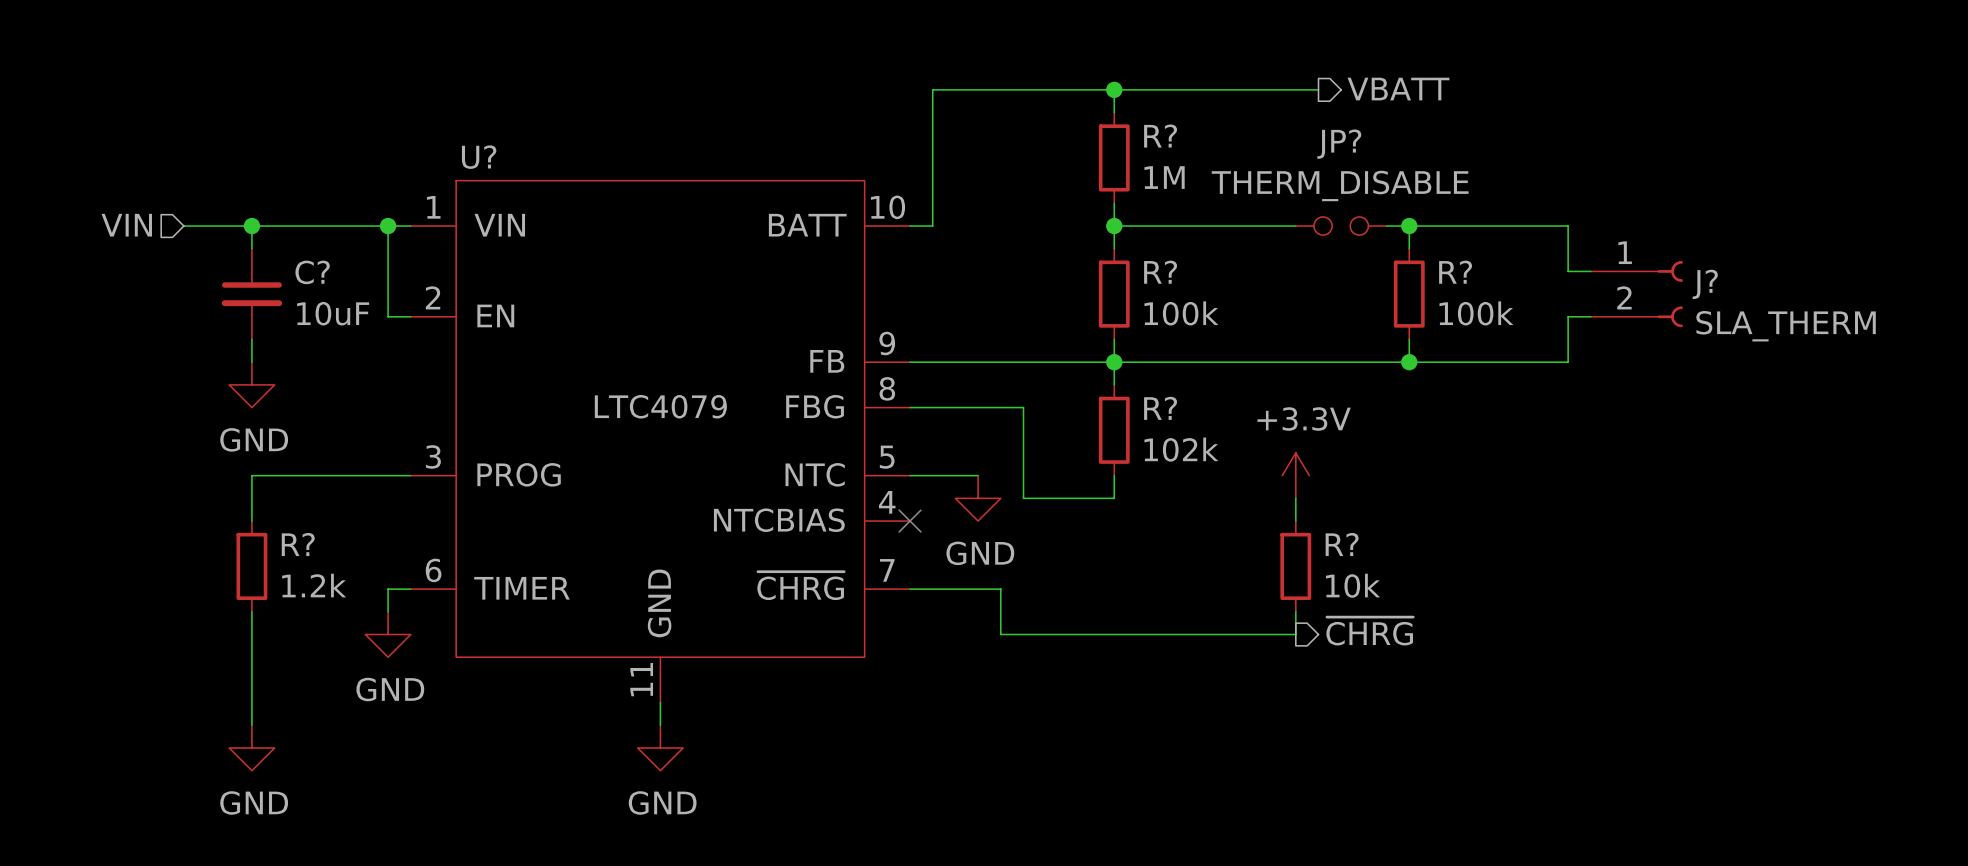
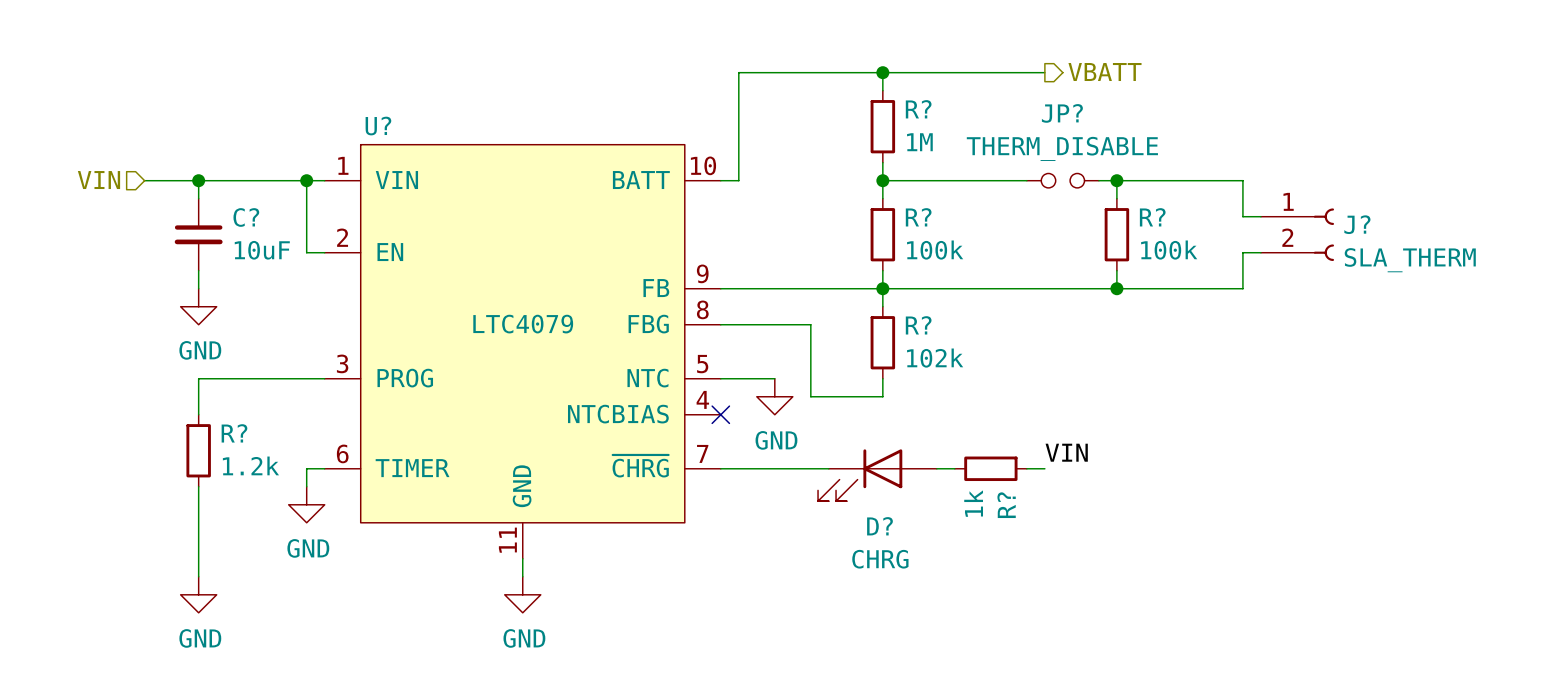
power symbol: +3.3V (1295, 475) -> none
wire: (1295, 498) (1295, 521) -> none
R?: 10k (1295, 566) -> none
label: none -> VIN (1066, 452)
wire: (1000, 589) (1000, 634) (1295, 634) (1295, 611) -> (792, 468) (828, 468)
wire: none -> (936, 468) (954, 468)
R?: none -> 1k (990, 468)
wire: none -> (1026, 468) (1044, 468)
D?: none -> CHRG (877, 475)
hierarchical label: ~{CHRG} (1369, 631) -> none

